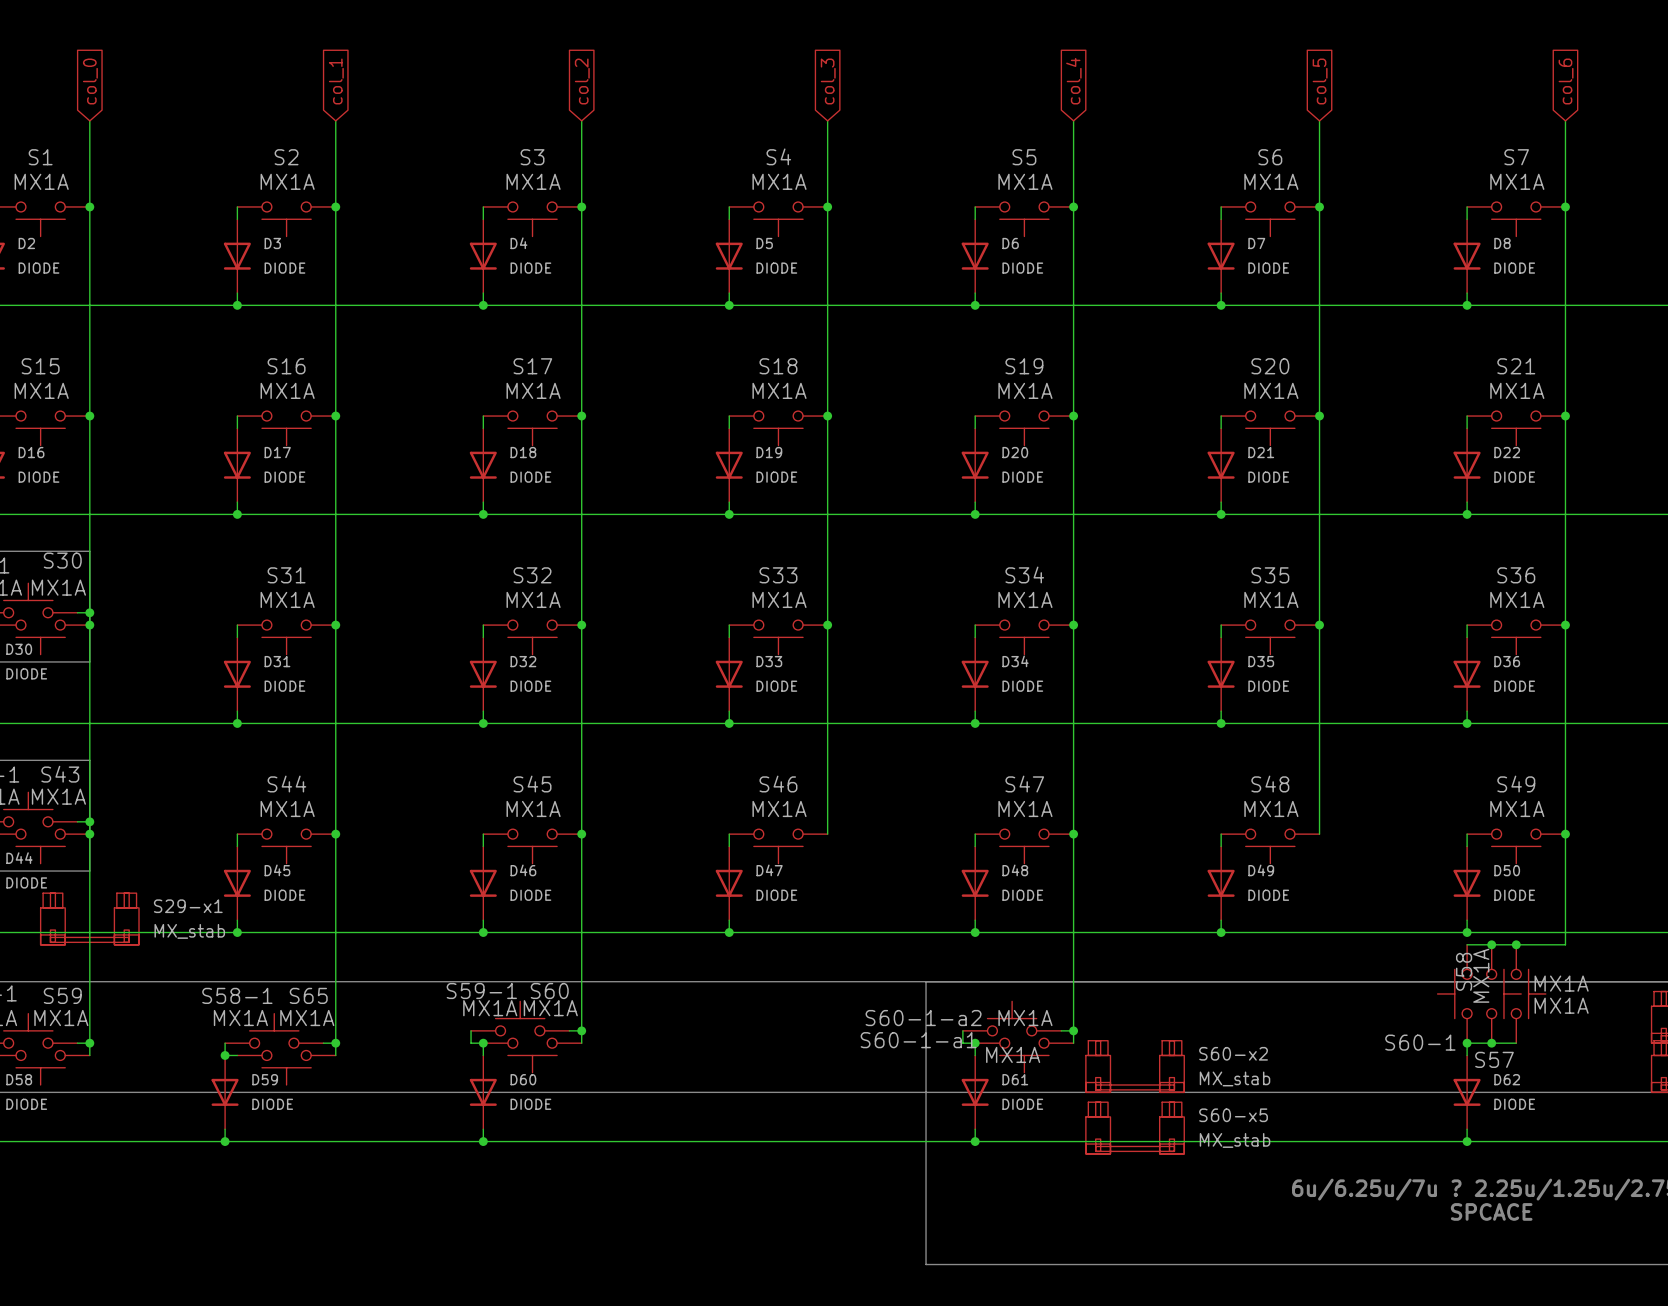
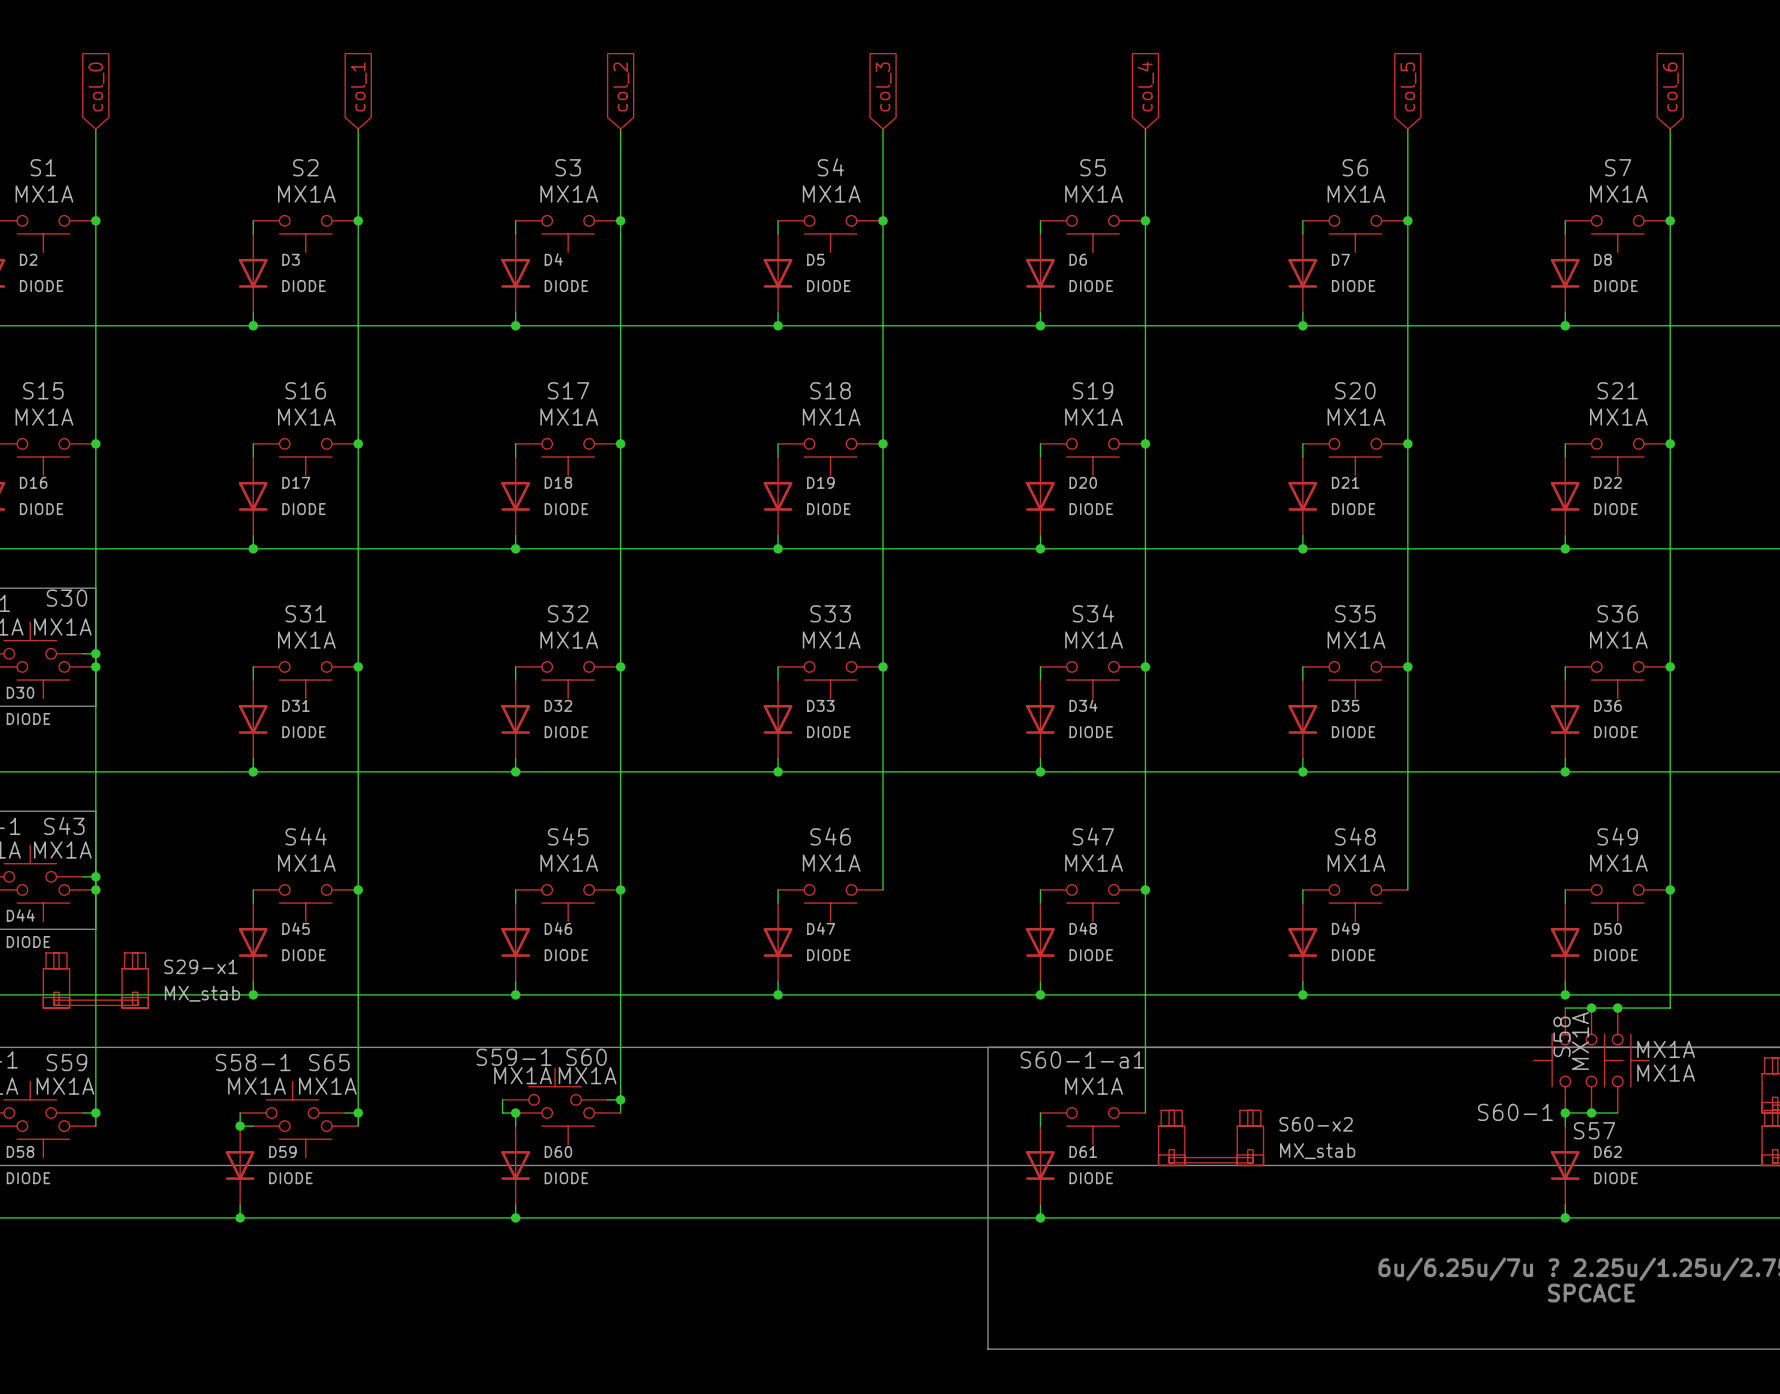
S60-1-a2: MX1A (1012, 1018) -> none
wire: (962, 1030) (962, 1043) (975, 1043) -> none
wire: (1061, 1030) (1073, 1030) -> none
junction: (1073, 1030) -> none
S60-1-a1 name position: S60-1-a1 (918, 1040) -> S60-1-a1 (1082, 1059)
junction: (975, 1043) -> none
S60-x5: MX_stab (1135, 1128) -> none

